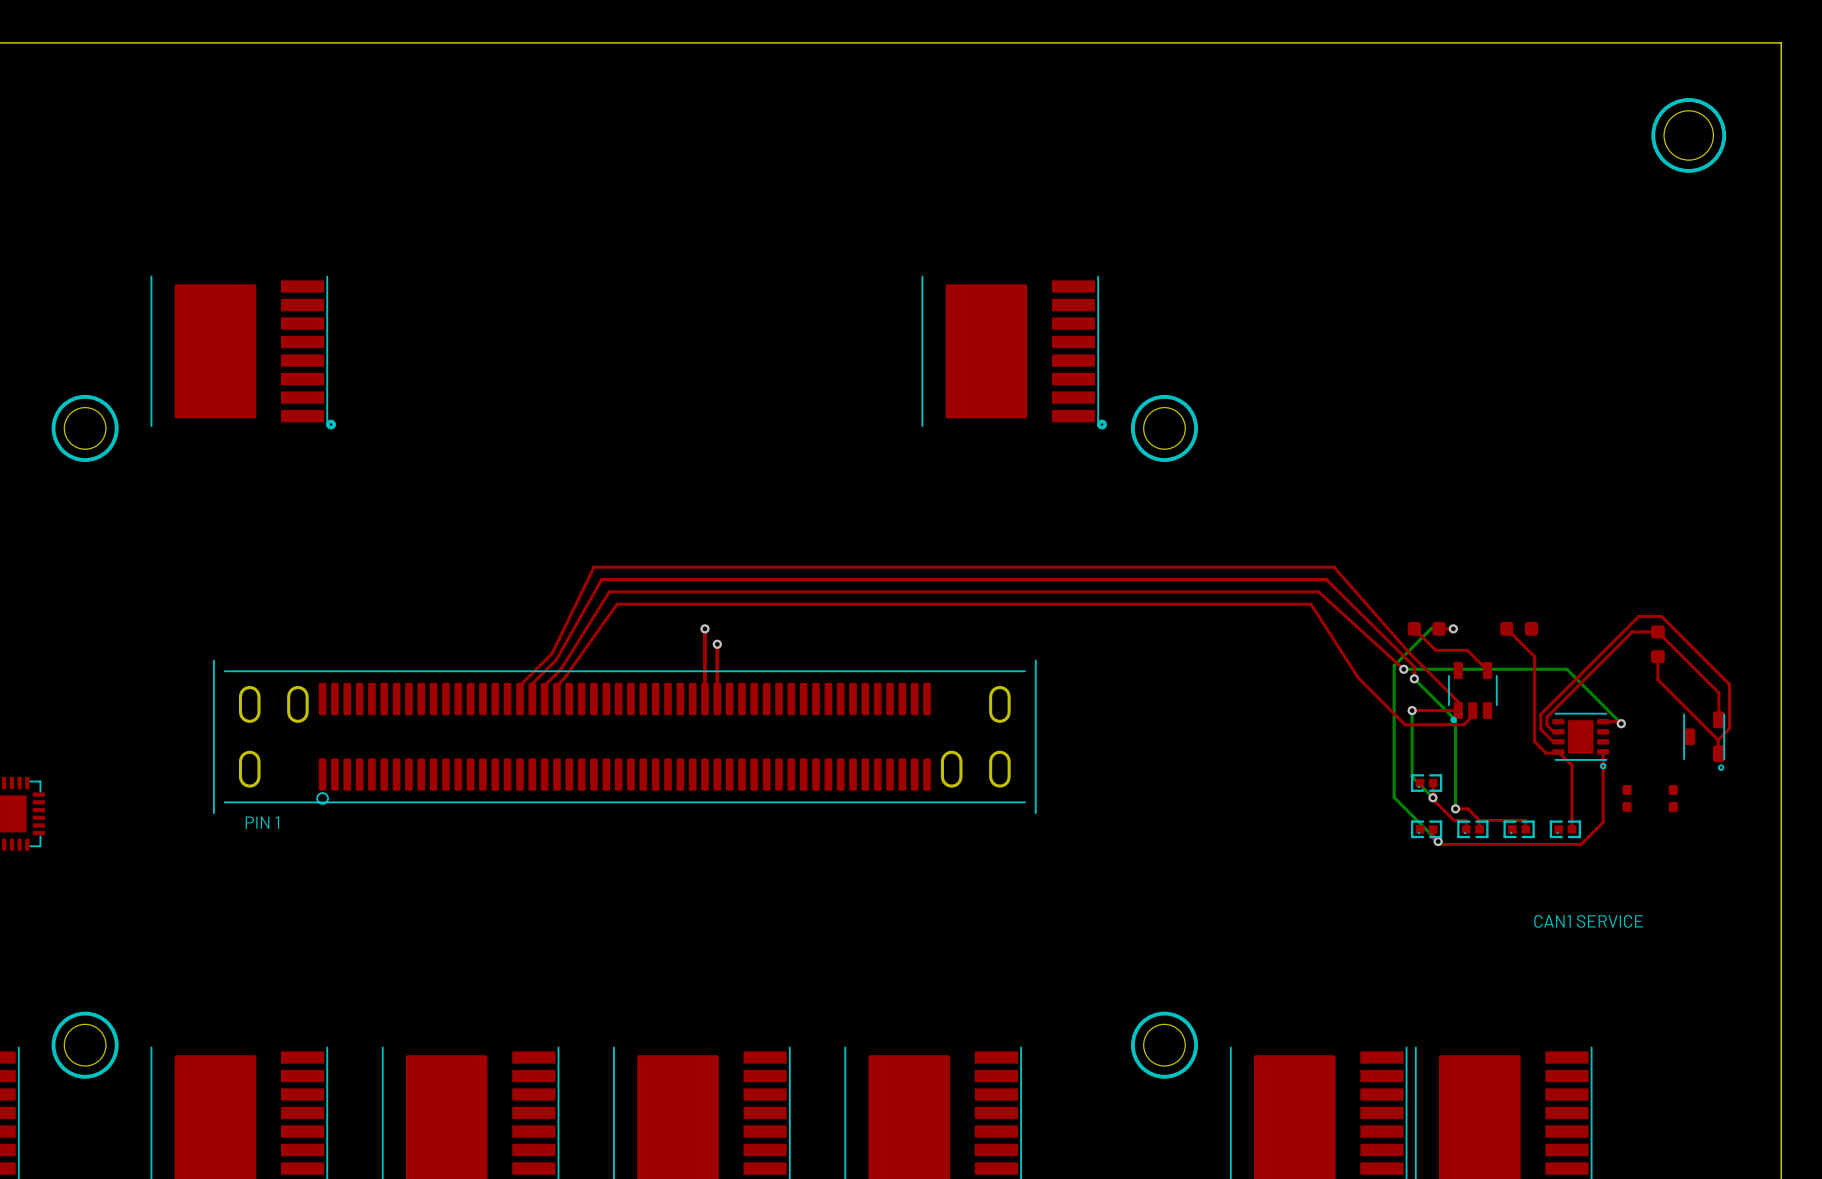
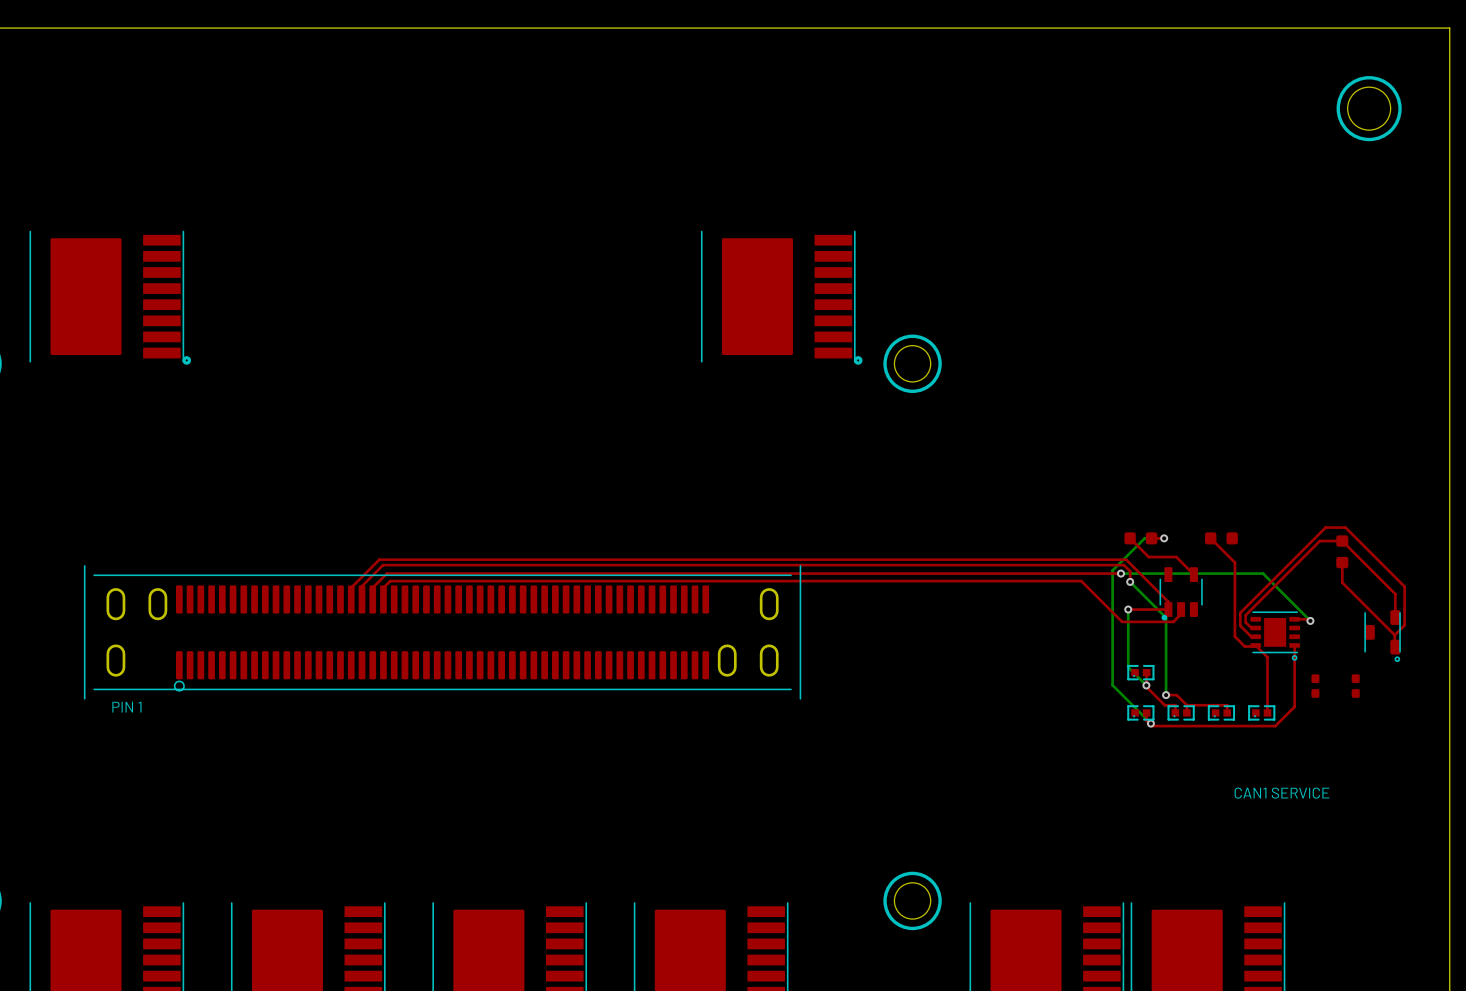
top track: (704, 628) (704, 699) -> none
via: (704, 628) -> none
top track: (717, 644) (717, 699) -> none
via: (717, 644) -> none
top track: (552, 653) (593, 567) (1334, 567) (1409, 653) -> (379, 559) (1126, 559)
top track: (556, 659) (601, 579) (1326, 579) (1407, 659) -> (383, 565) (1123, 565)
top track: (560, 669) (609, 591) (1318, 591) (1403, 669) -> (386, 573) (1120, 573)
top track: (564, 677) (617, 604) (1310, 604) (1358, 677) -> (390, 581) (1081, 581)

